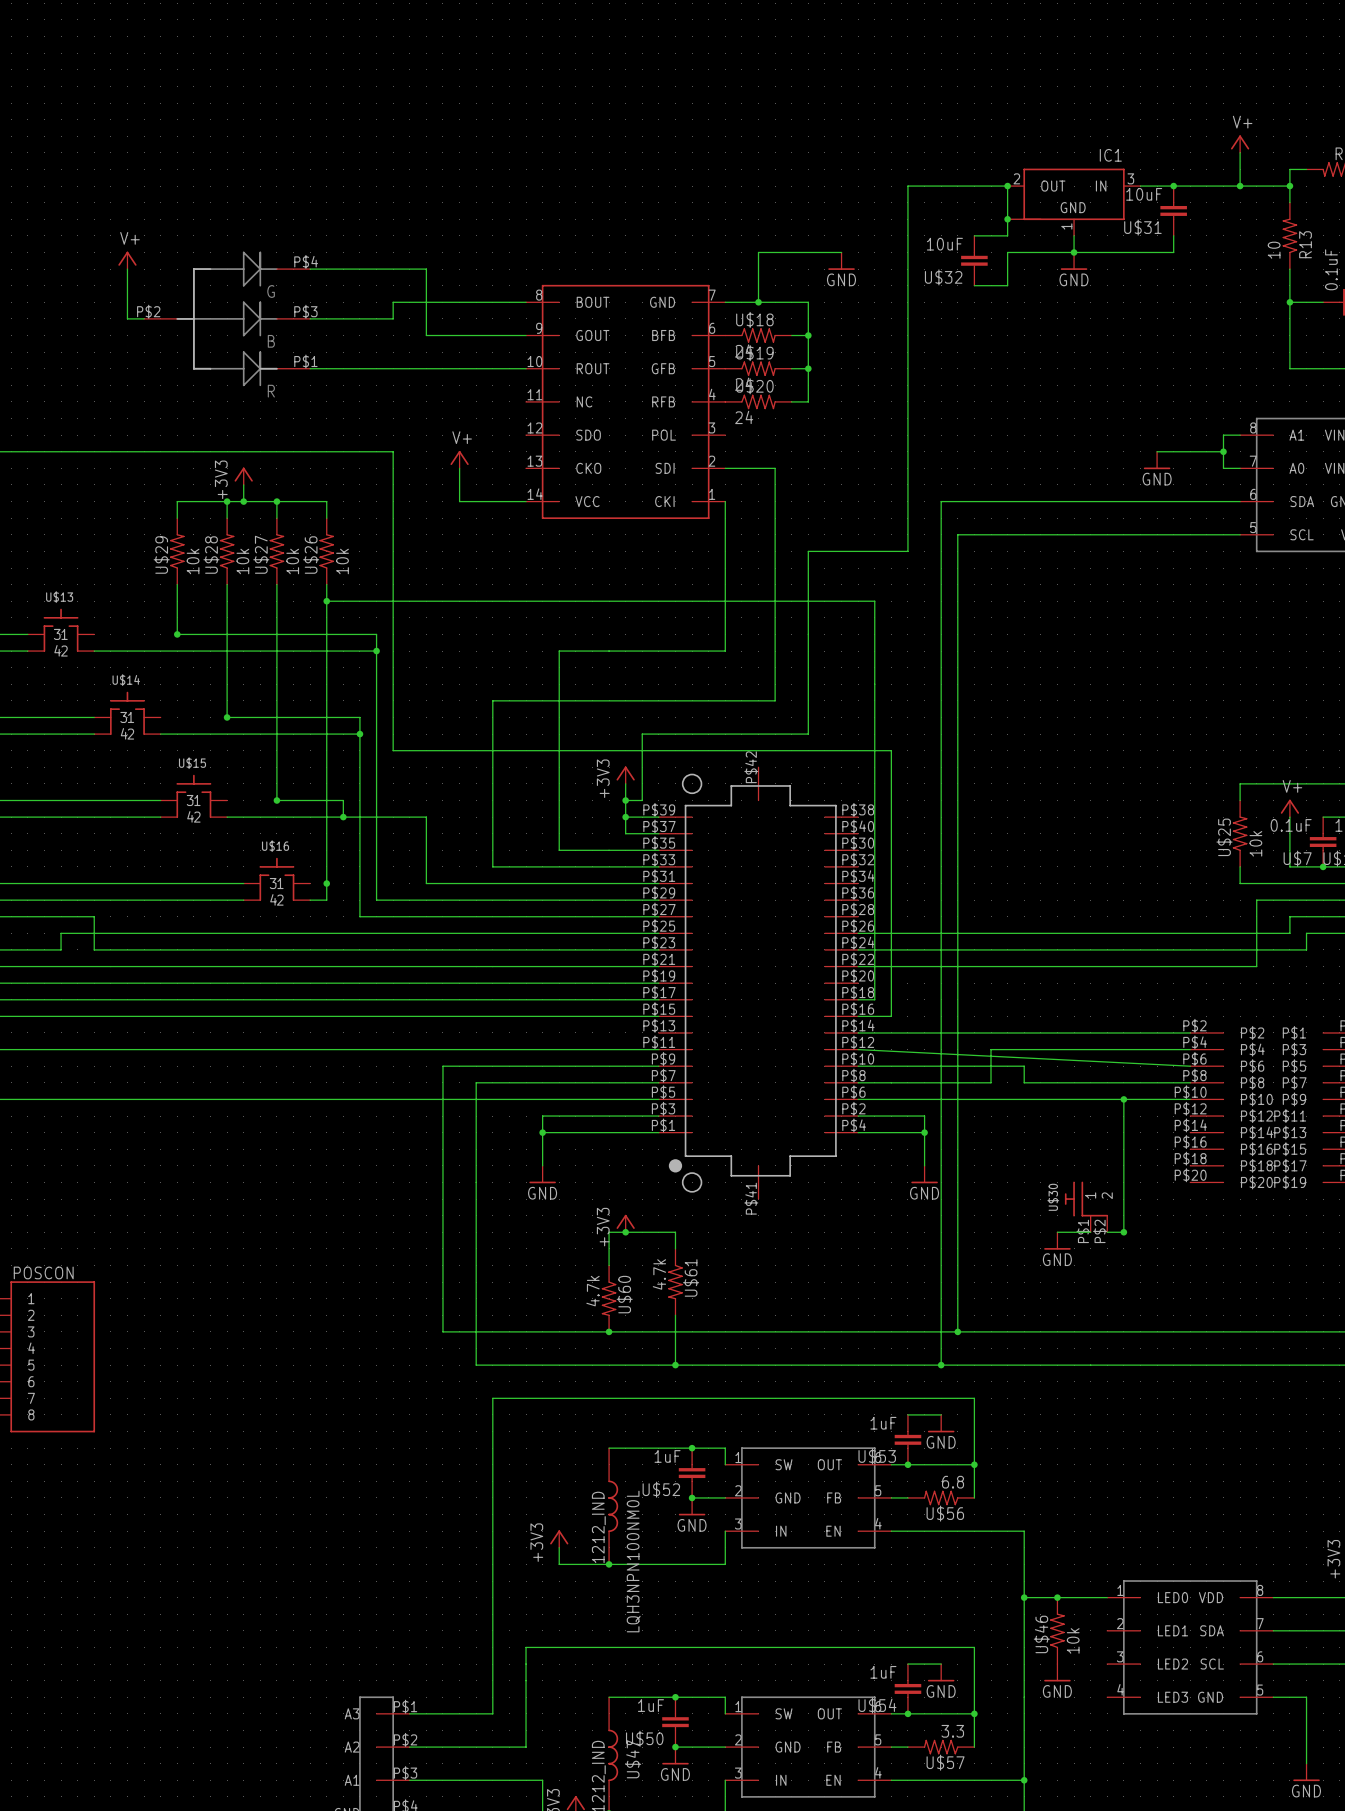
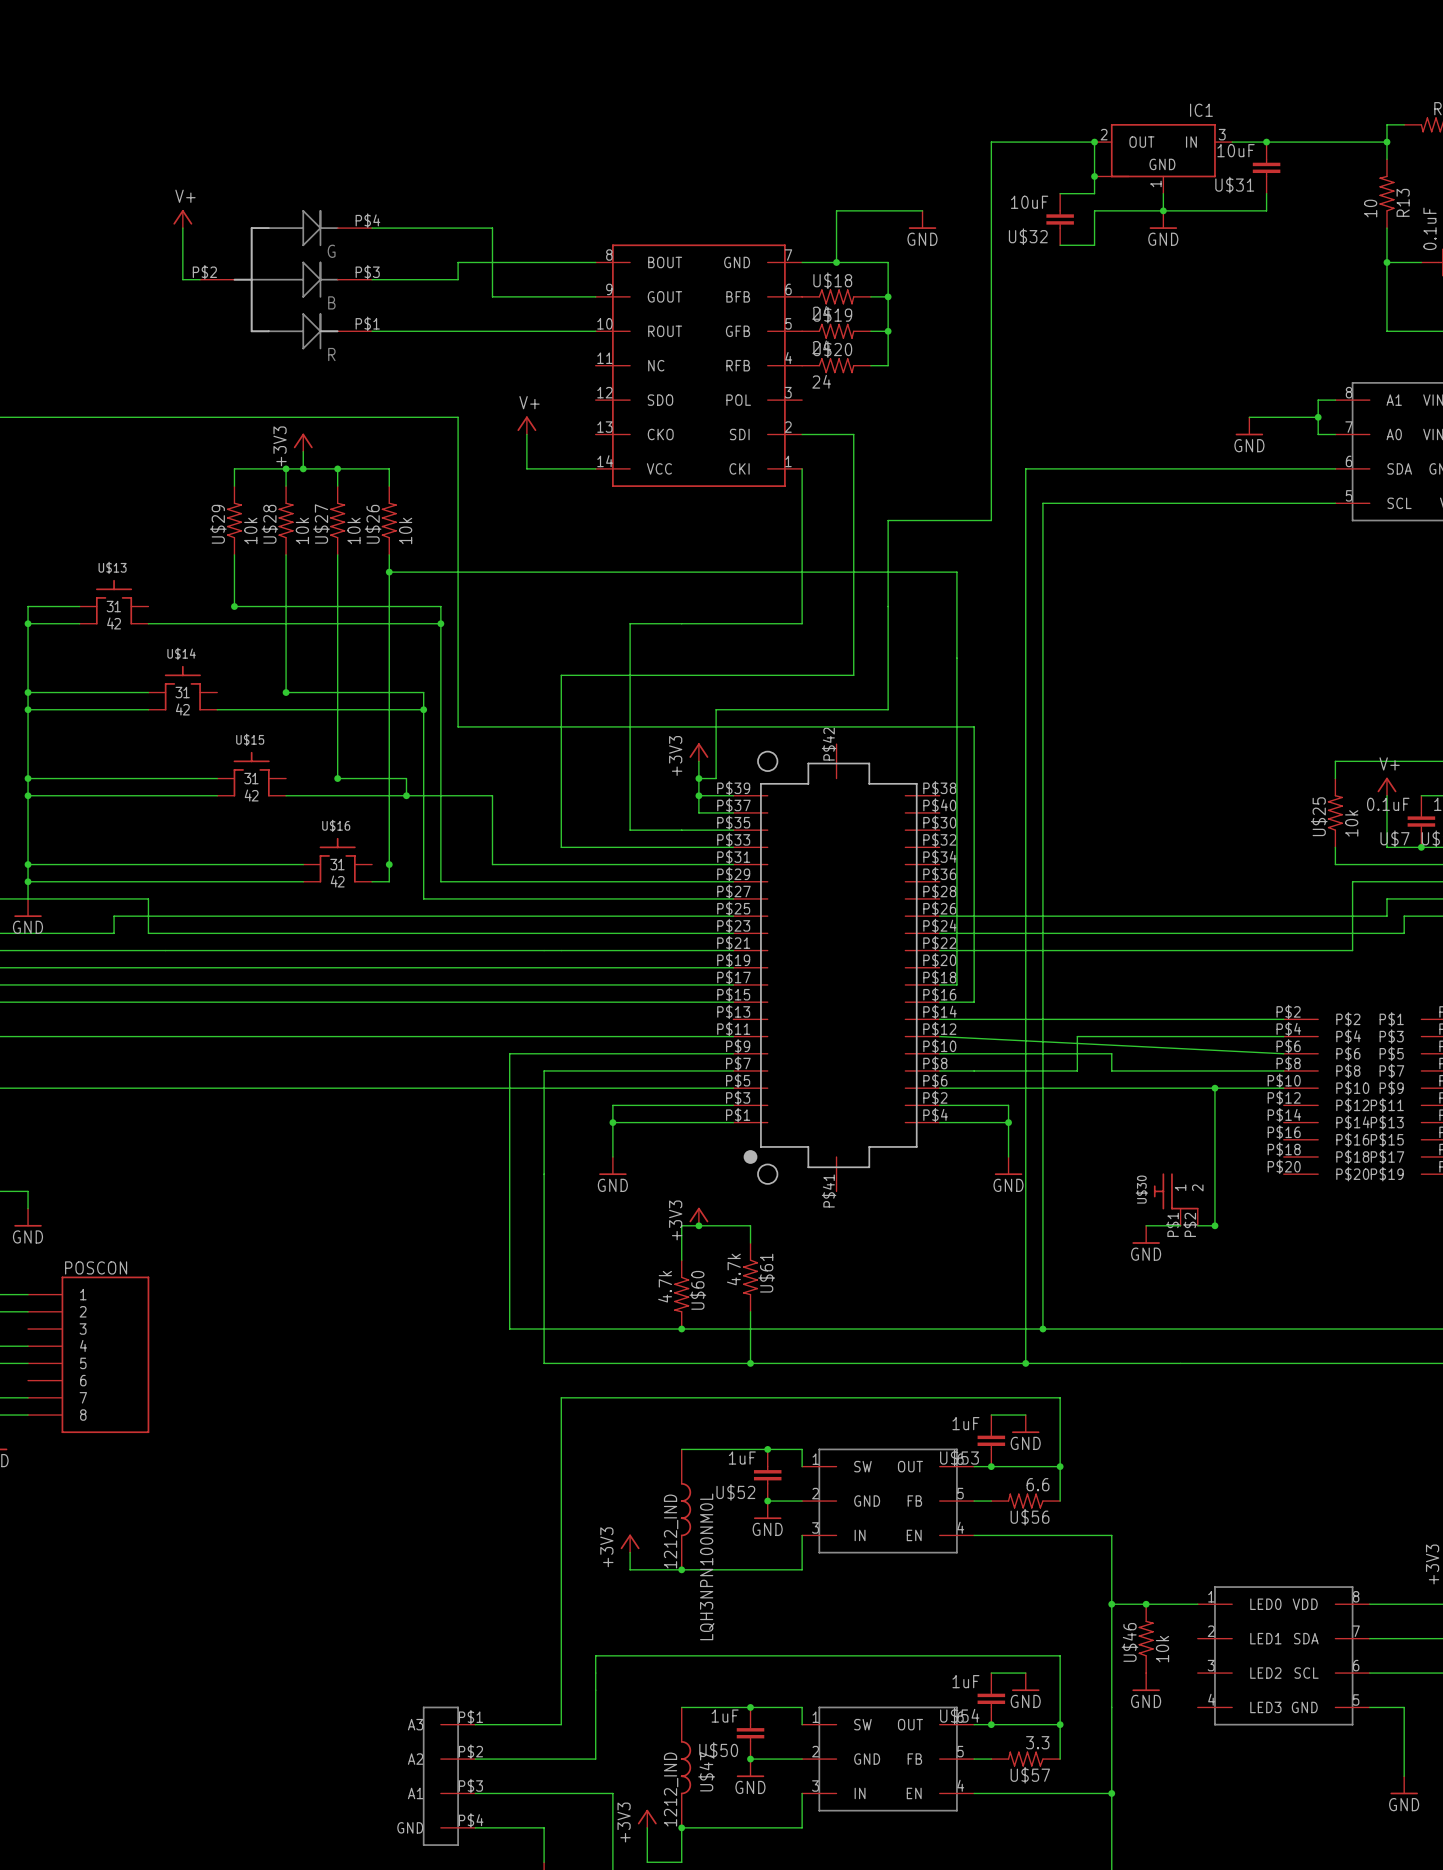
power symbol: V+ (1240, 144) -> none
wire: (1240, 152) (1240, 186) -> none
junction: (1240, 186) -> none
U$56 value: 6.8 (953, 1482) -> 6.6 (1038, 1484)

